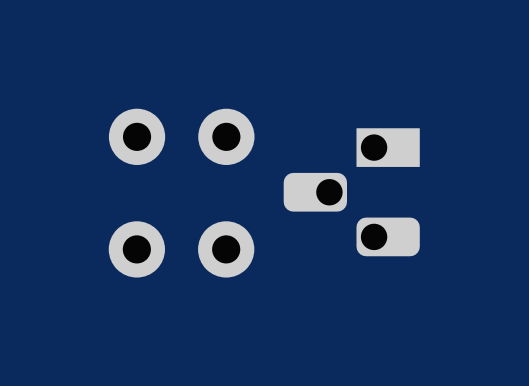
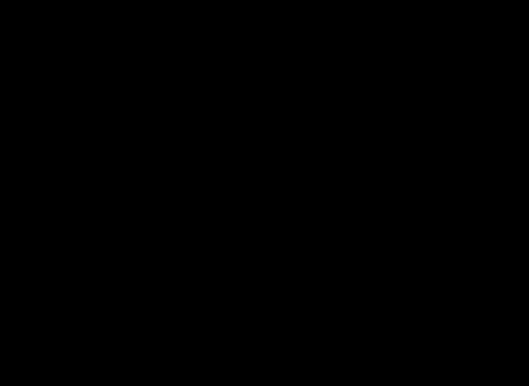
part: (181, 136) -> none
part: (351, 192) -> none
part: (181, 249) -> none

